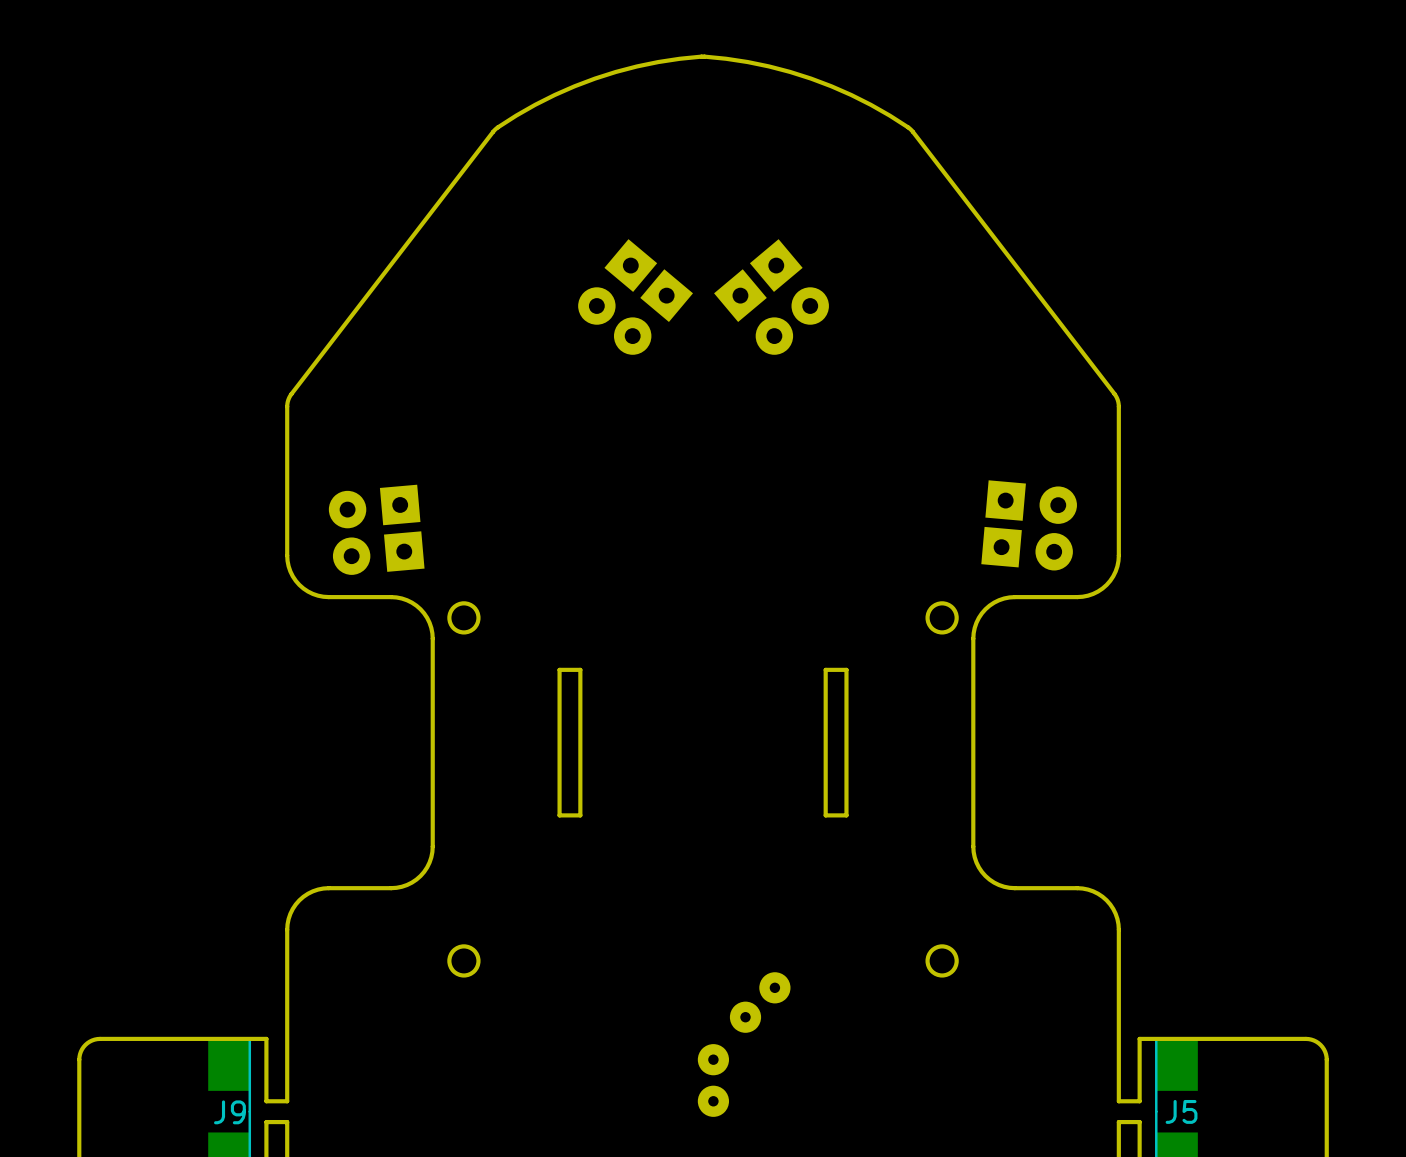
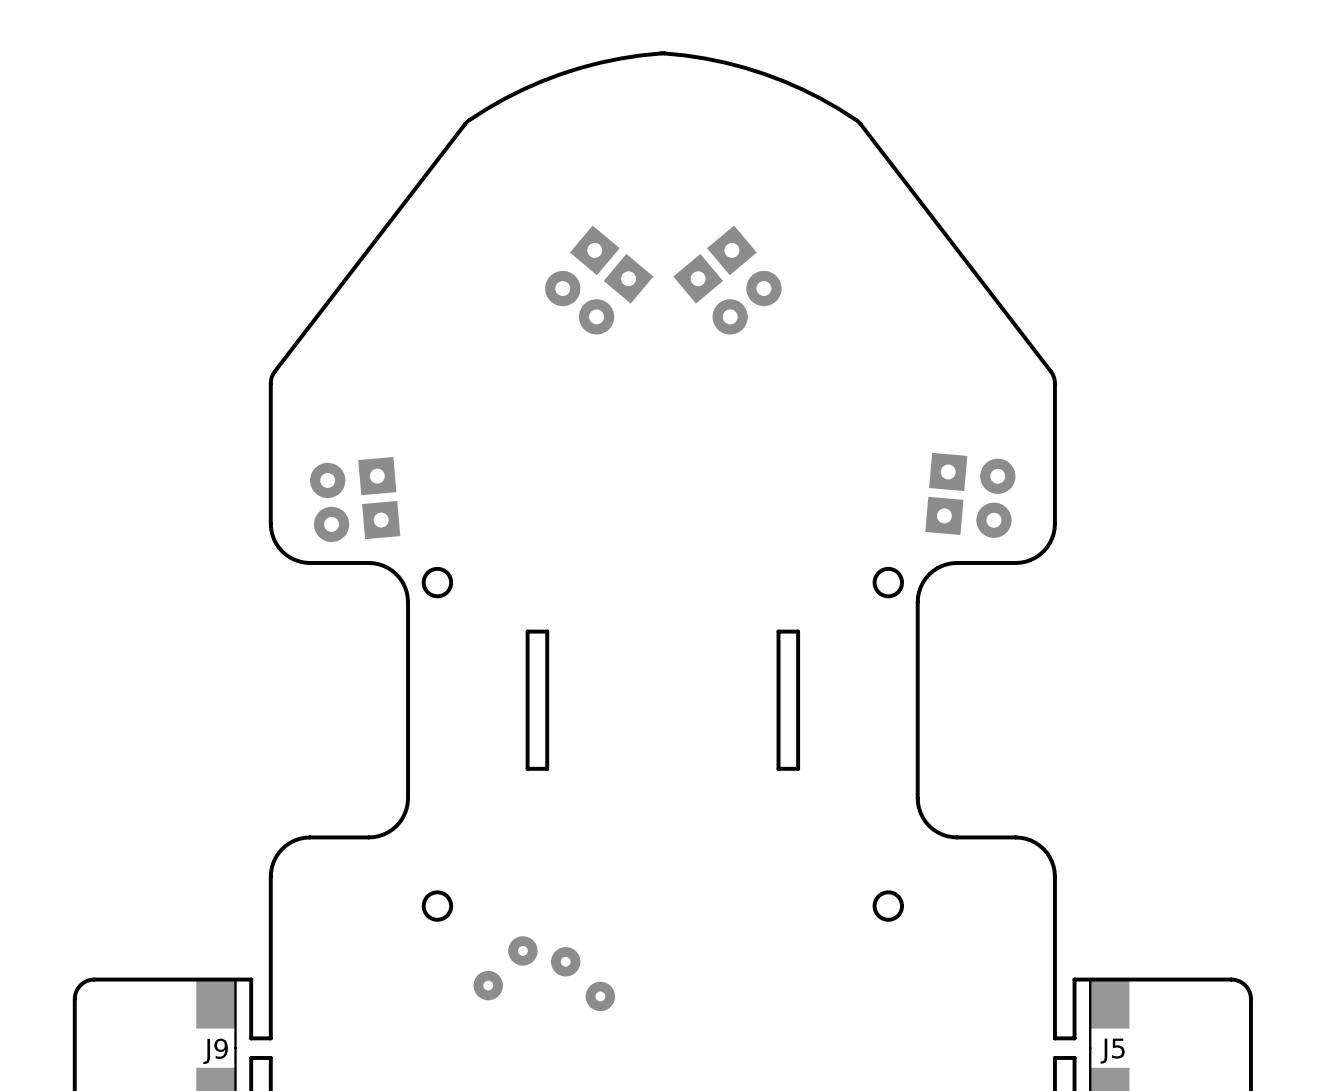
part: (760, 1002) -> none
part: none -> (505, 968)
part: none -> (583, 979)
part: (713, 1080) -> none

